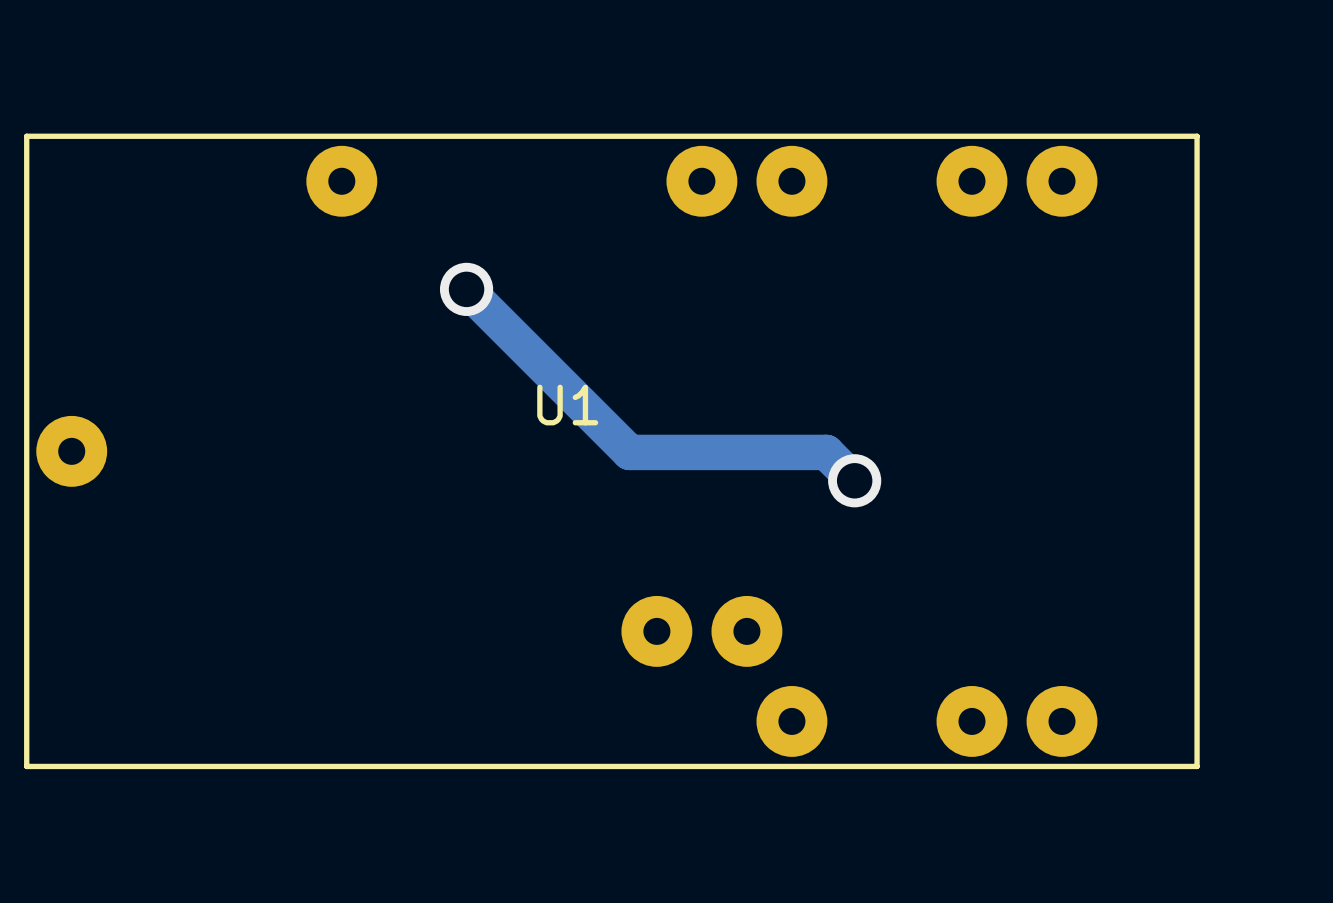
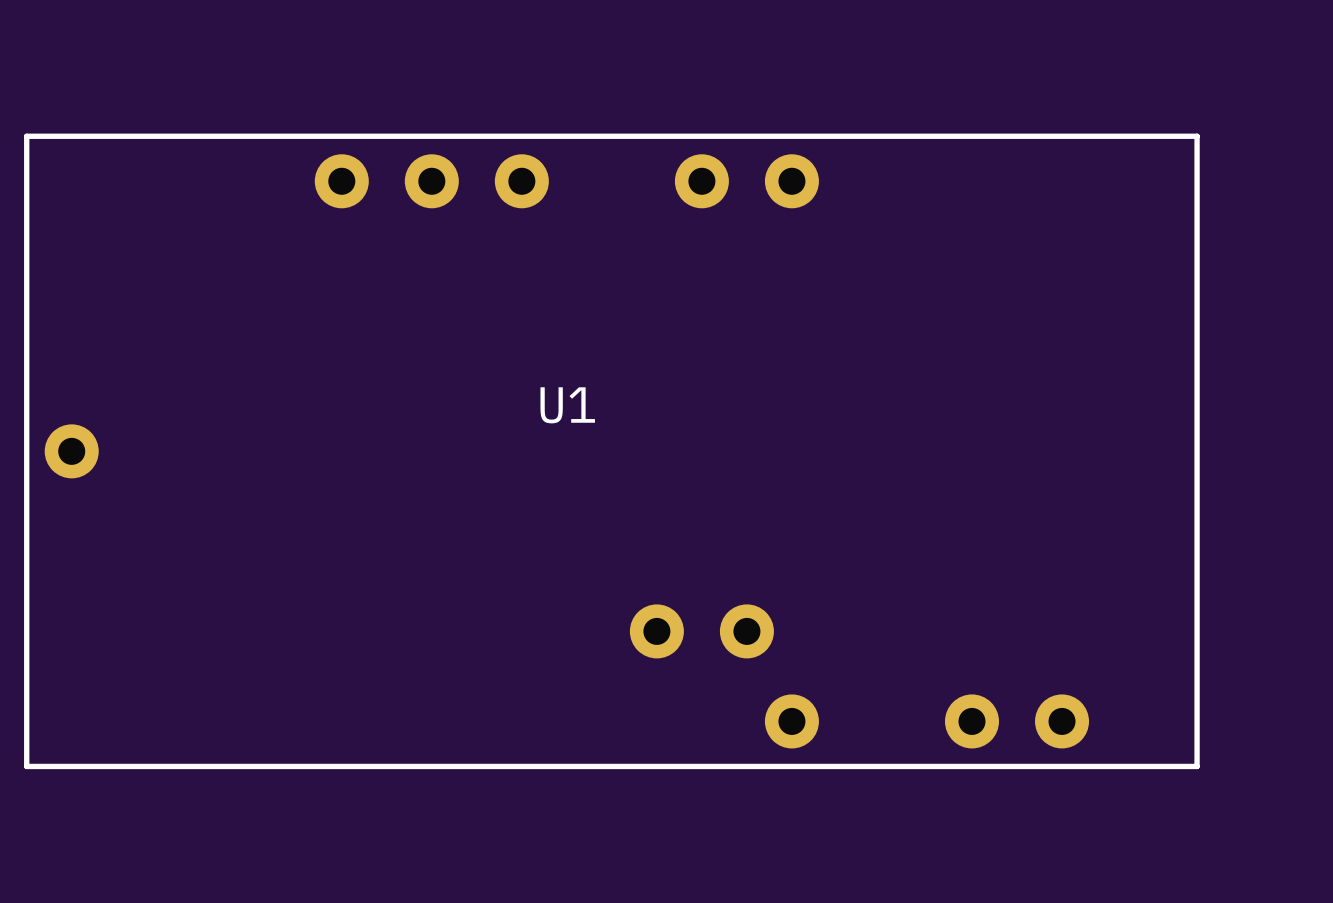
U1 footprint: [24, 133, 1200, 770] -> [24, 133, 1200, 770]
track: (466, 289) (629, 452) (826, 452) (854, 480) -> none
via: (466, 289) -> none
via: (854, 480) -> none

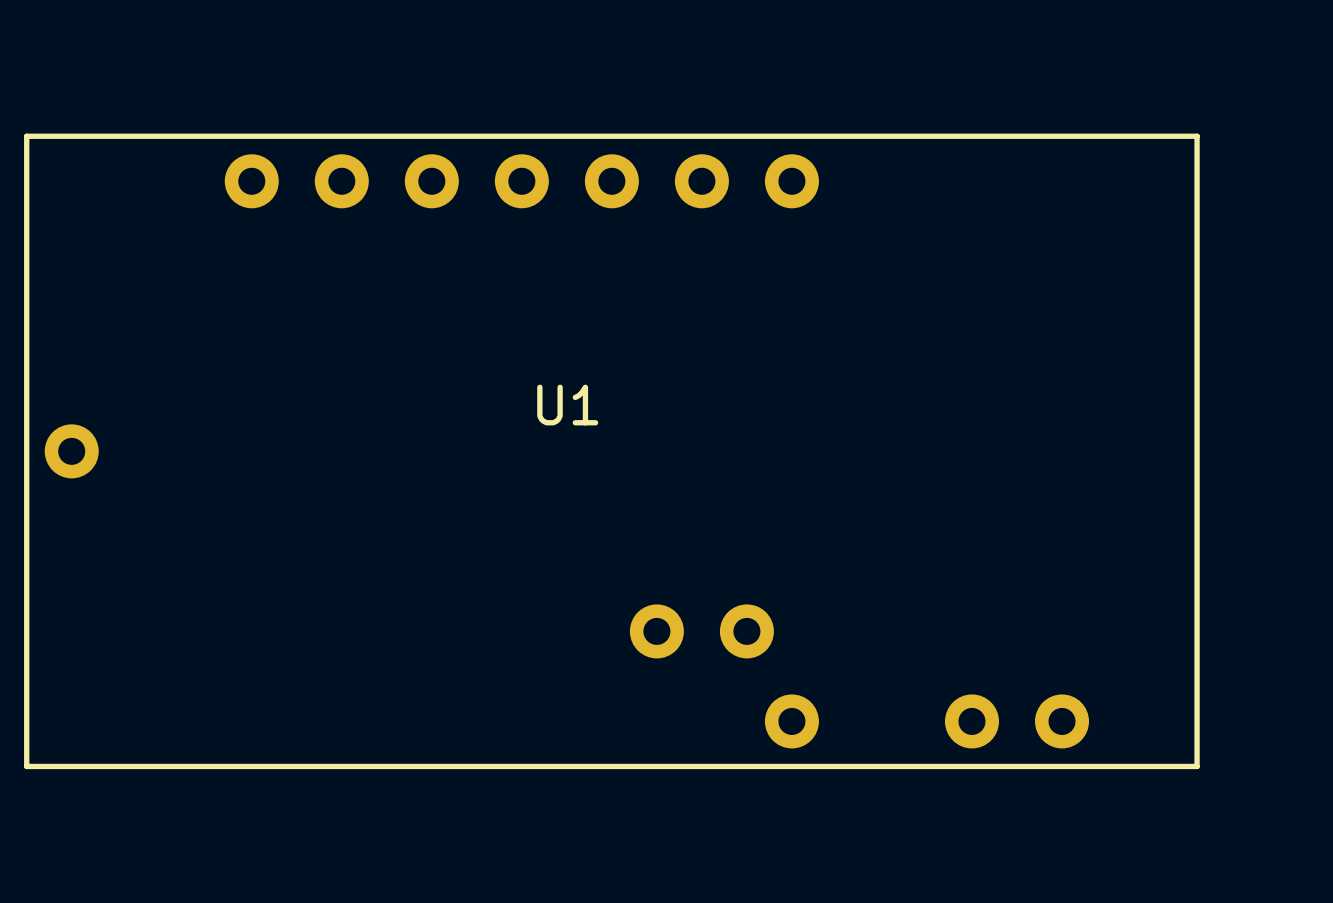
U1 footprint: [24, 133, 1200, 770] -> [24, 133, 1200, 770]

